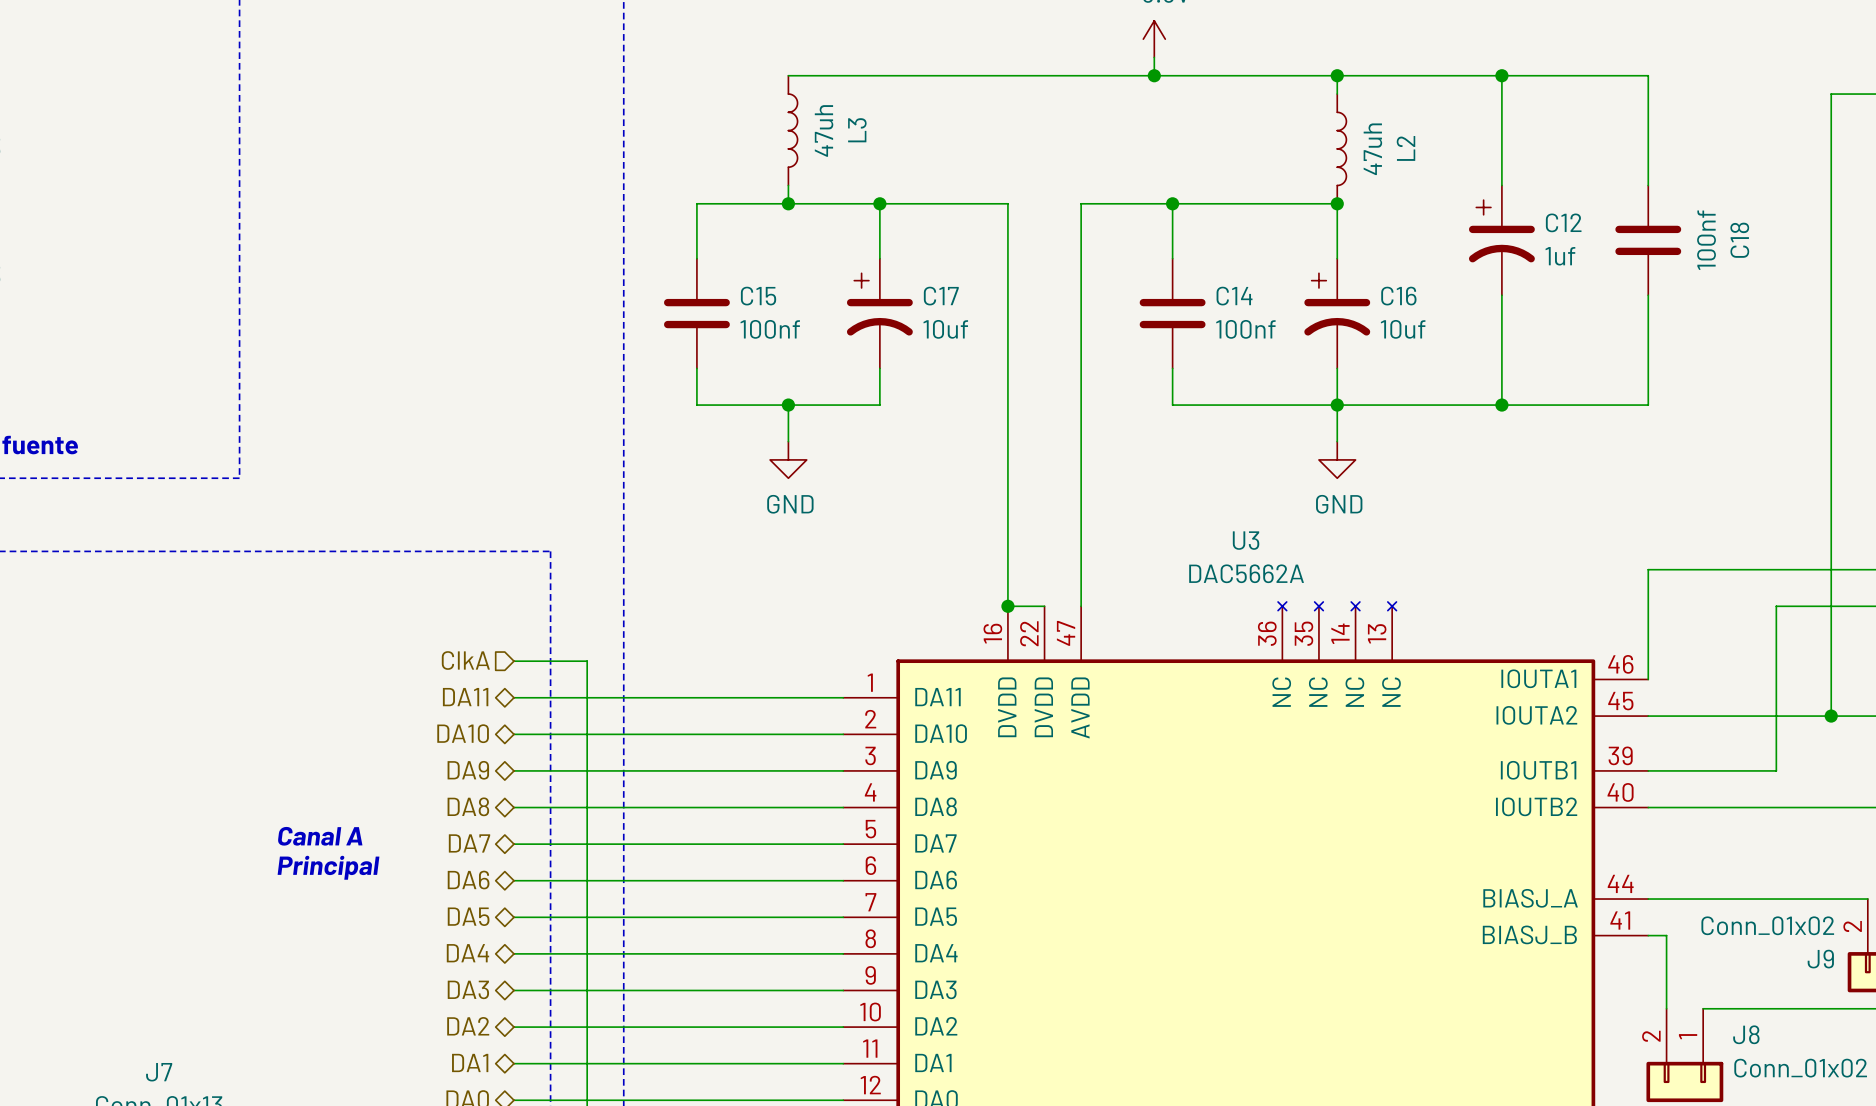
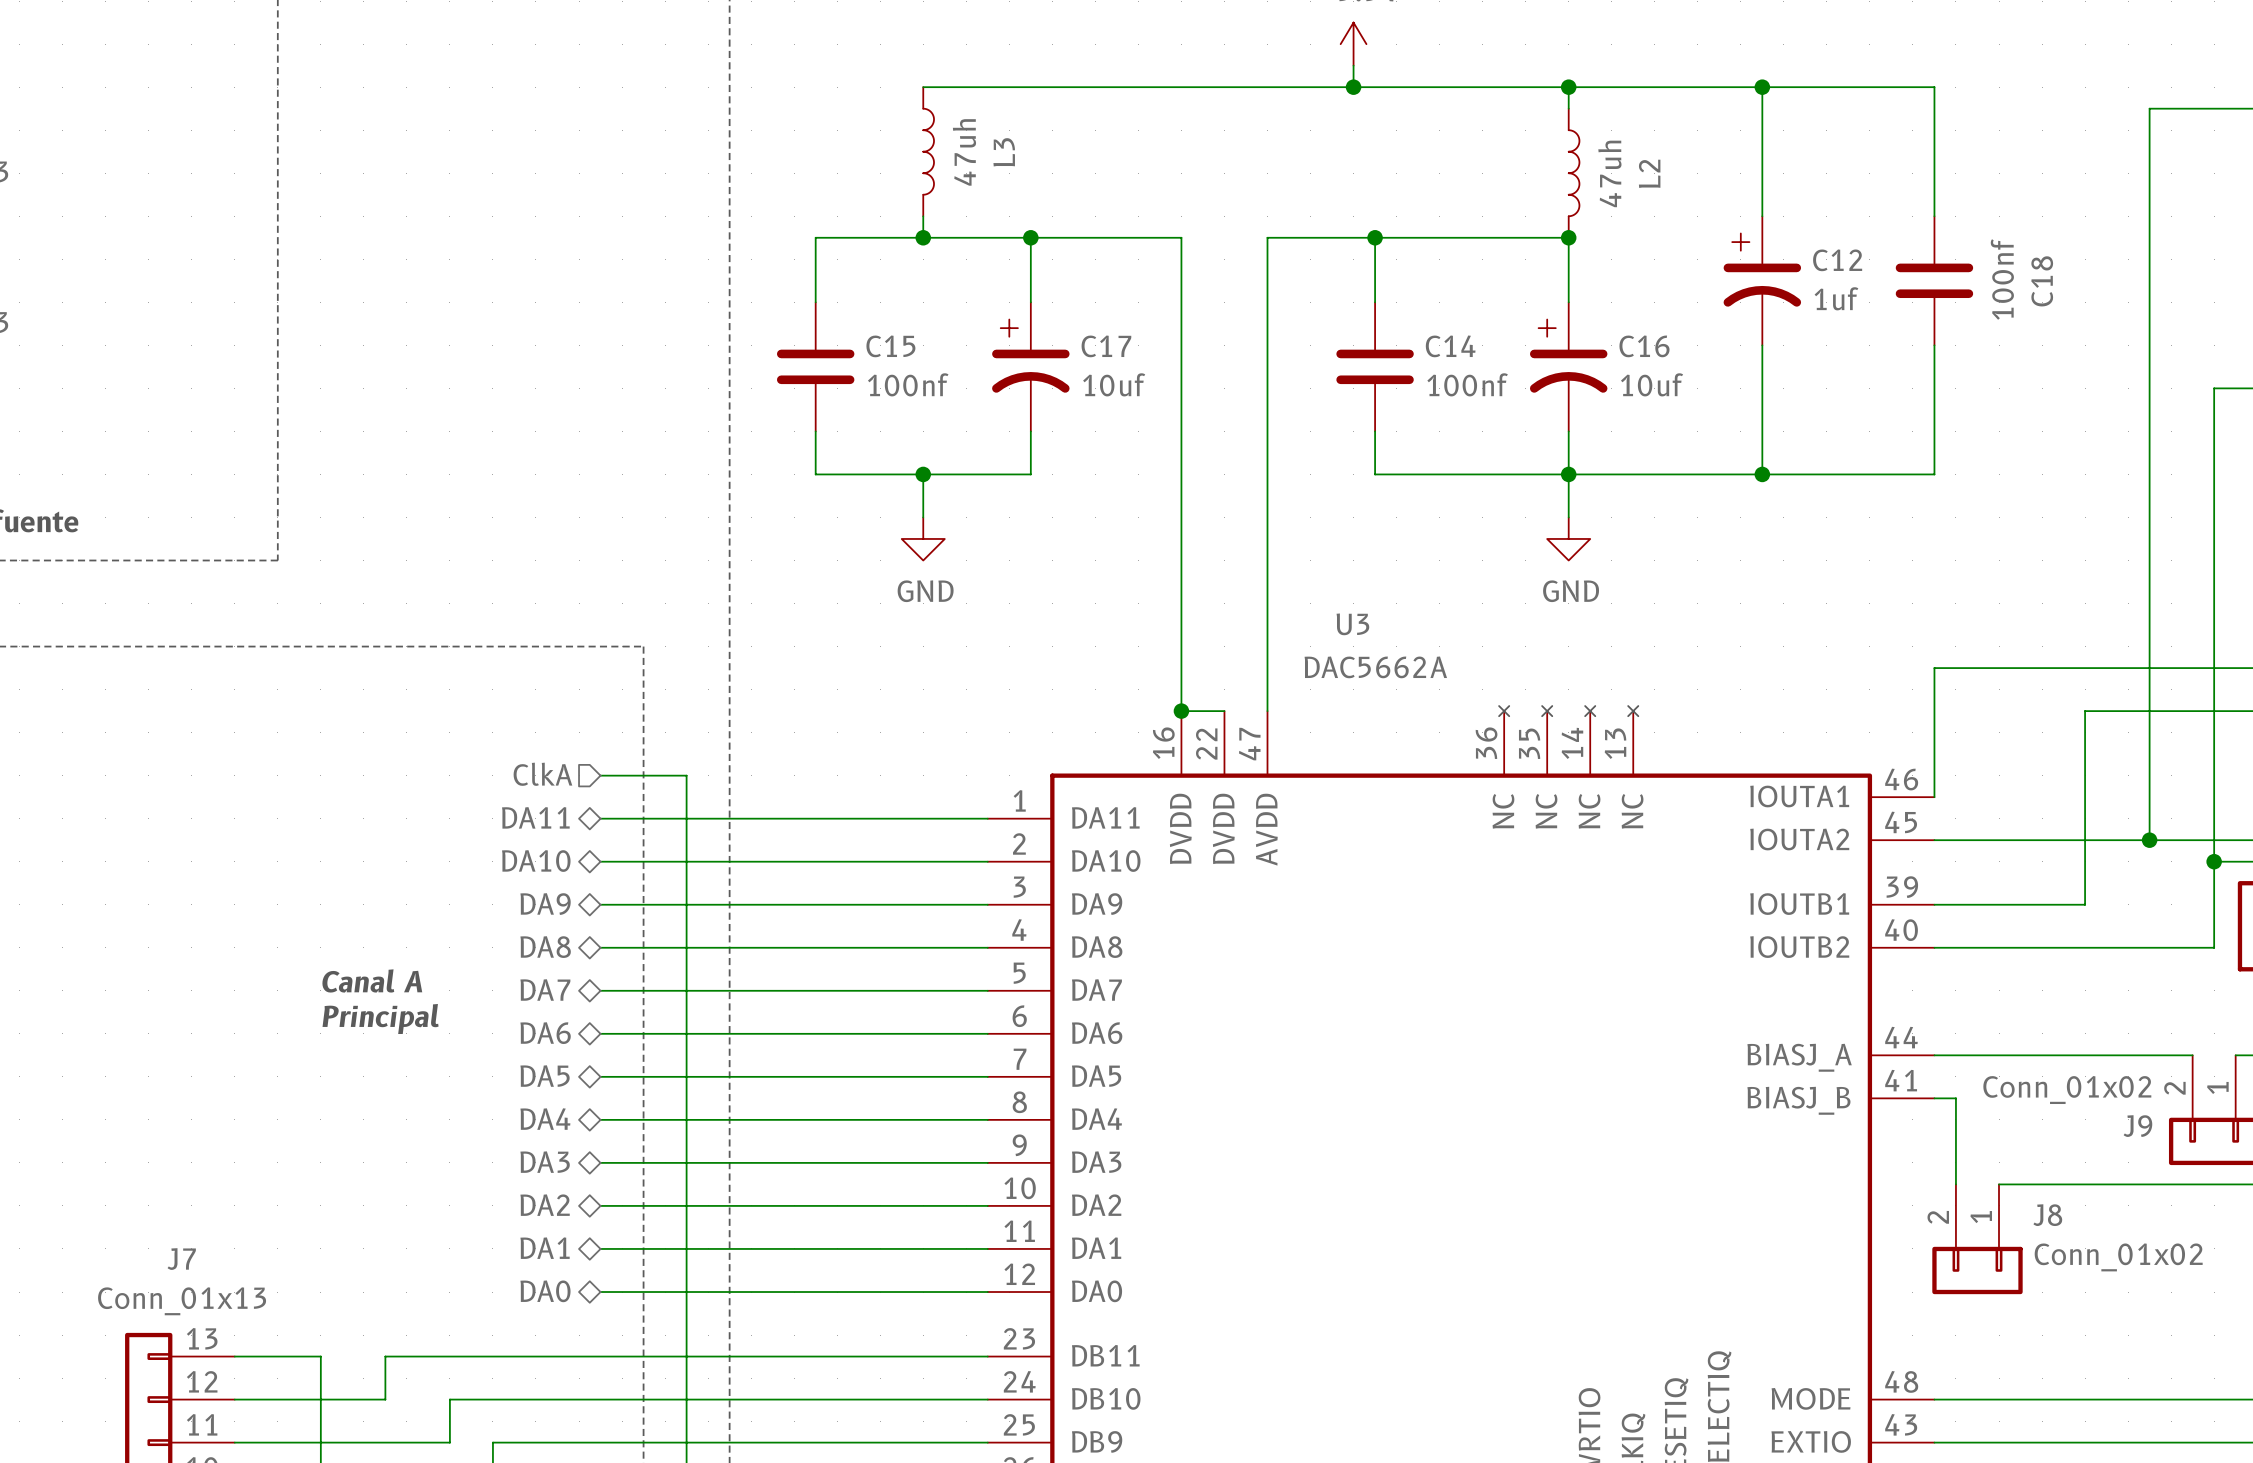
U3 name position: U3 (1246, 540) -> U3 (1352, 624)
U3 value position: DAC5662A (1246, 573) -> DAC5662A (1375, 667)

